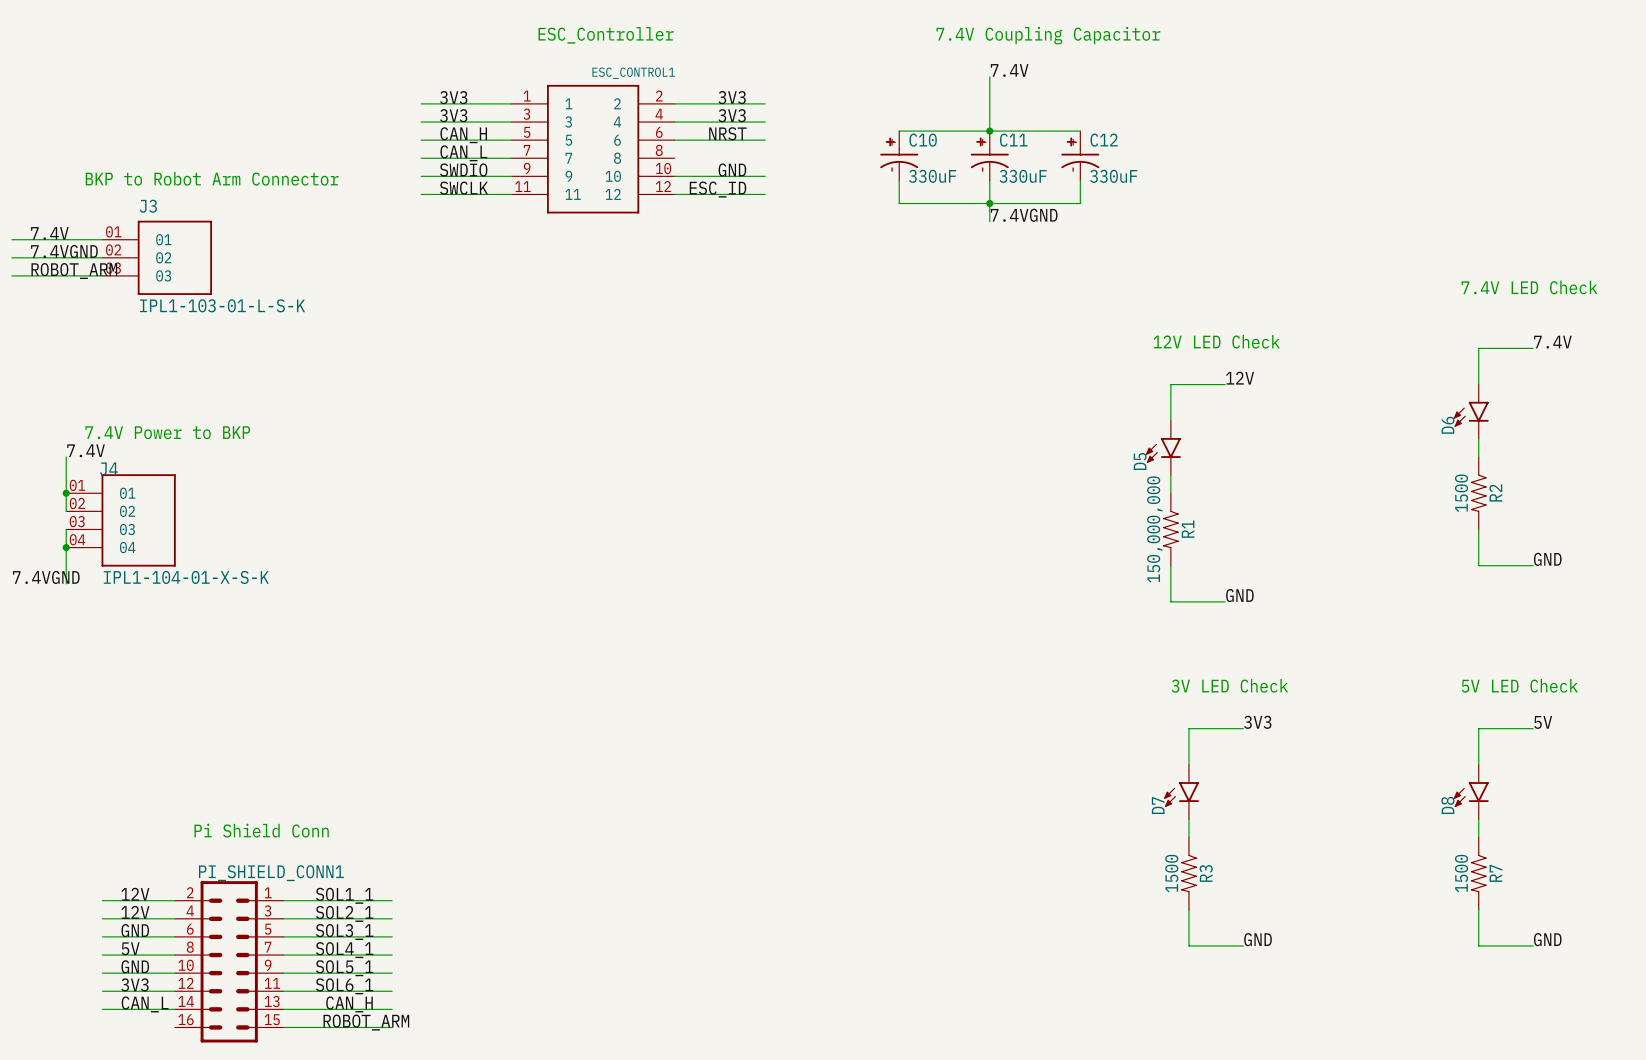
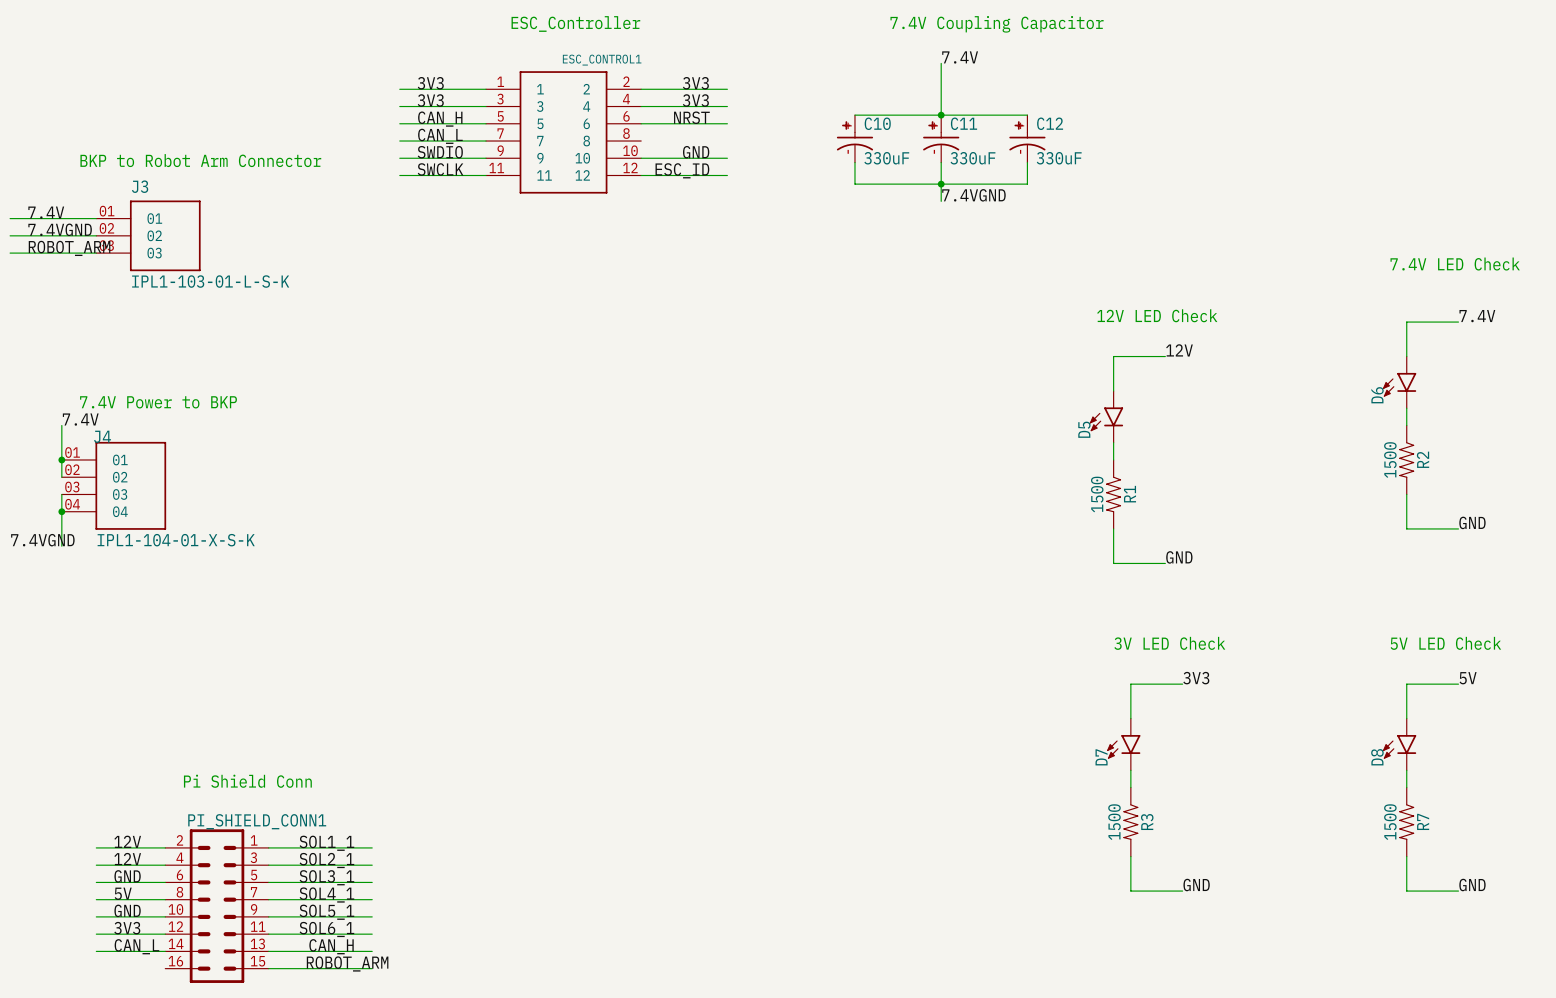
R1 value: 150,000,000 (1154, 529) -> 1500 (1097, 494)

